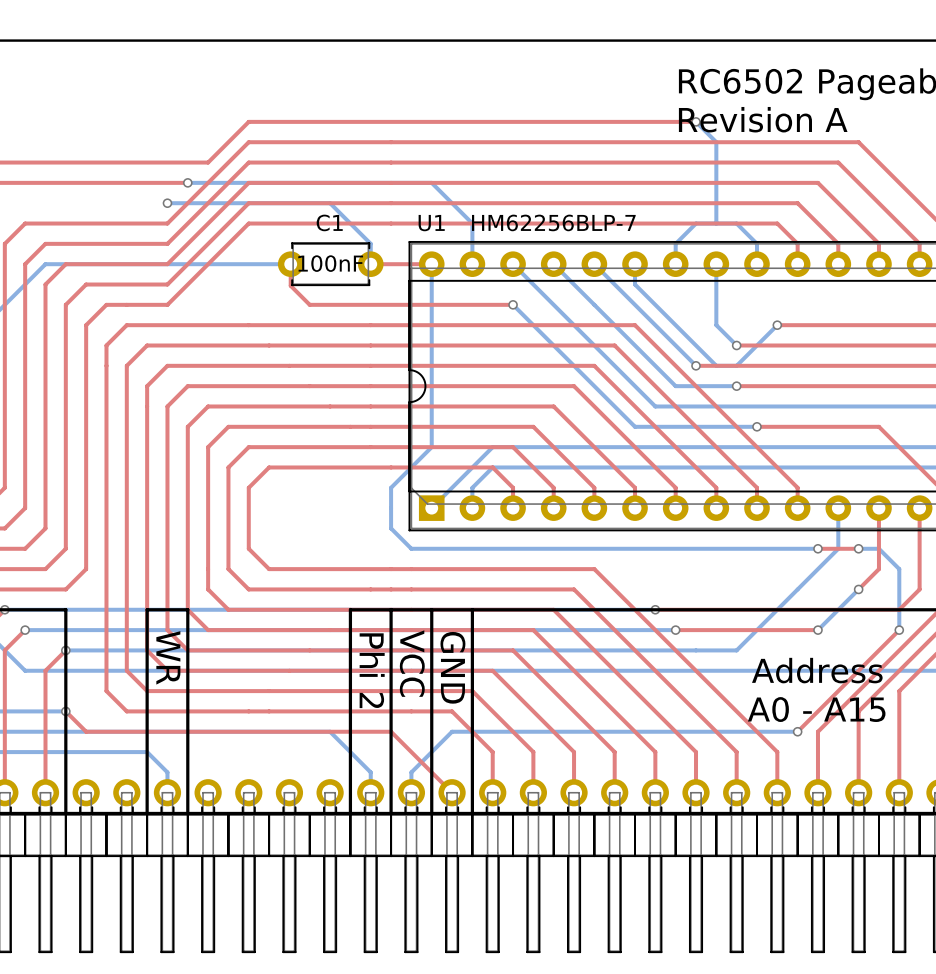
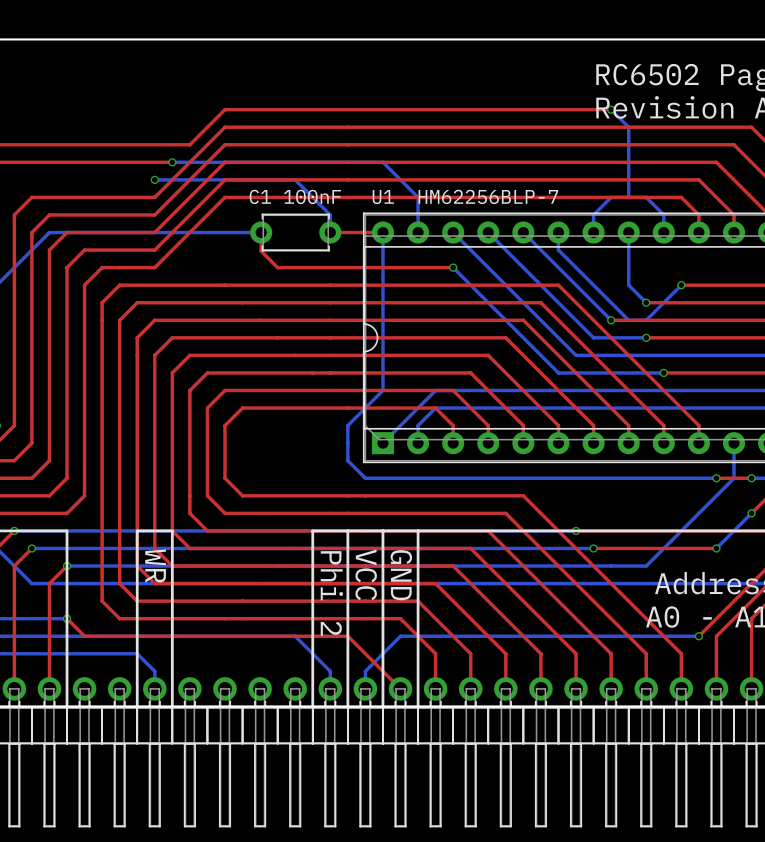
C1 name position: C1 (329, 222) -> C1 (260, 196)
C1 value position: 100nF (330, 263) -> 100nF (312, 196)

